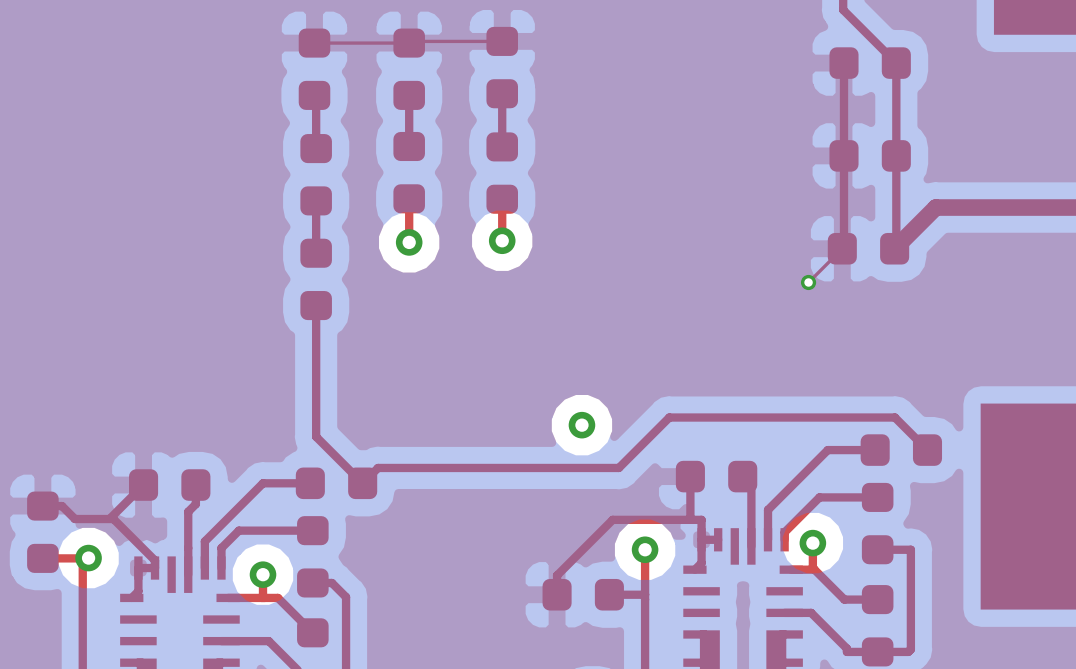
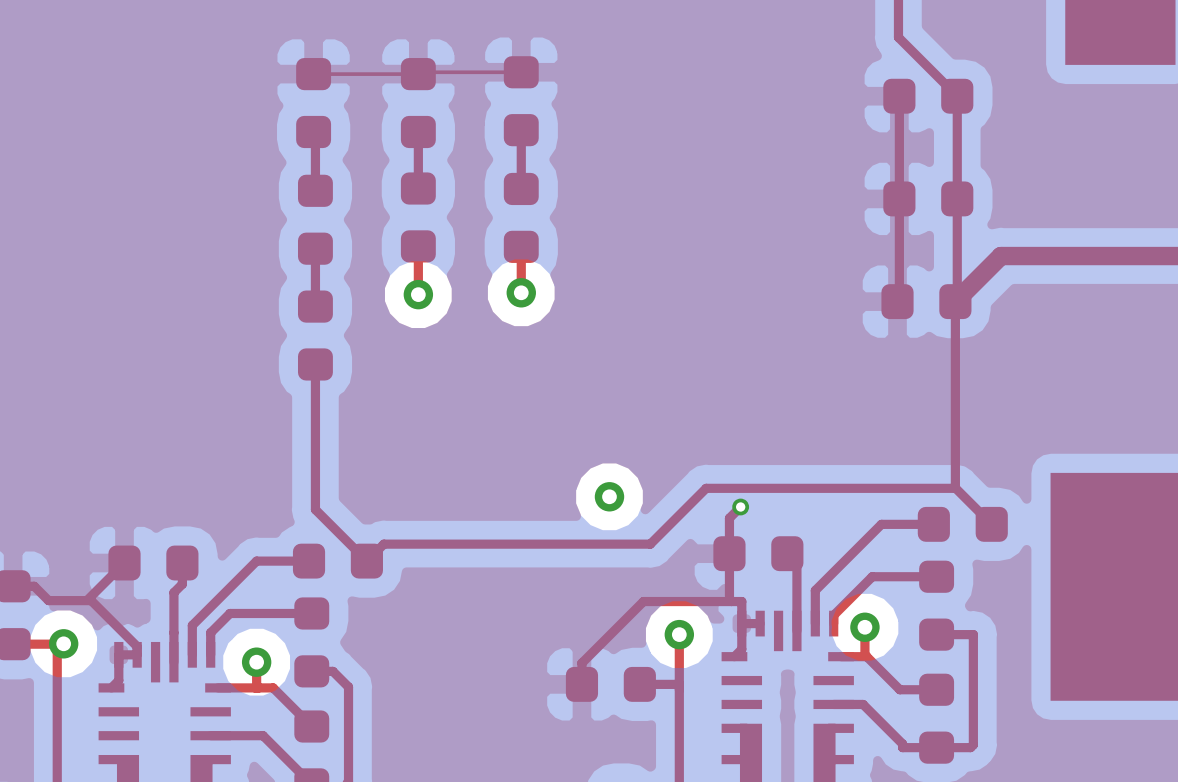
top track: (842, 248) (808, 282) -> none
top track: none -> (955, 301) (955, 488)
via position: (808, 282) -> (740, 507)
top track: none -> (740, 507) (729, 518) (729, 553)

